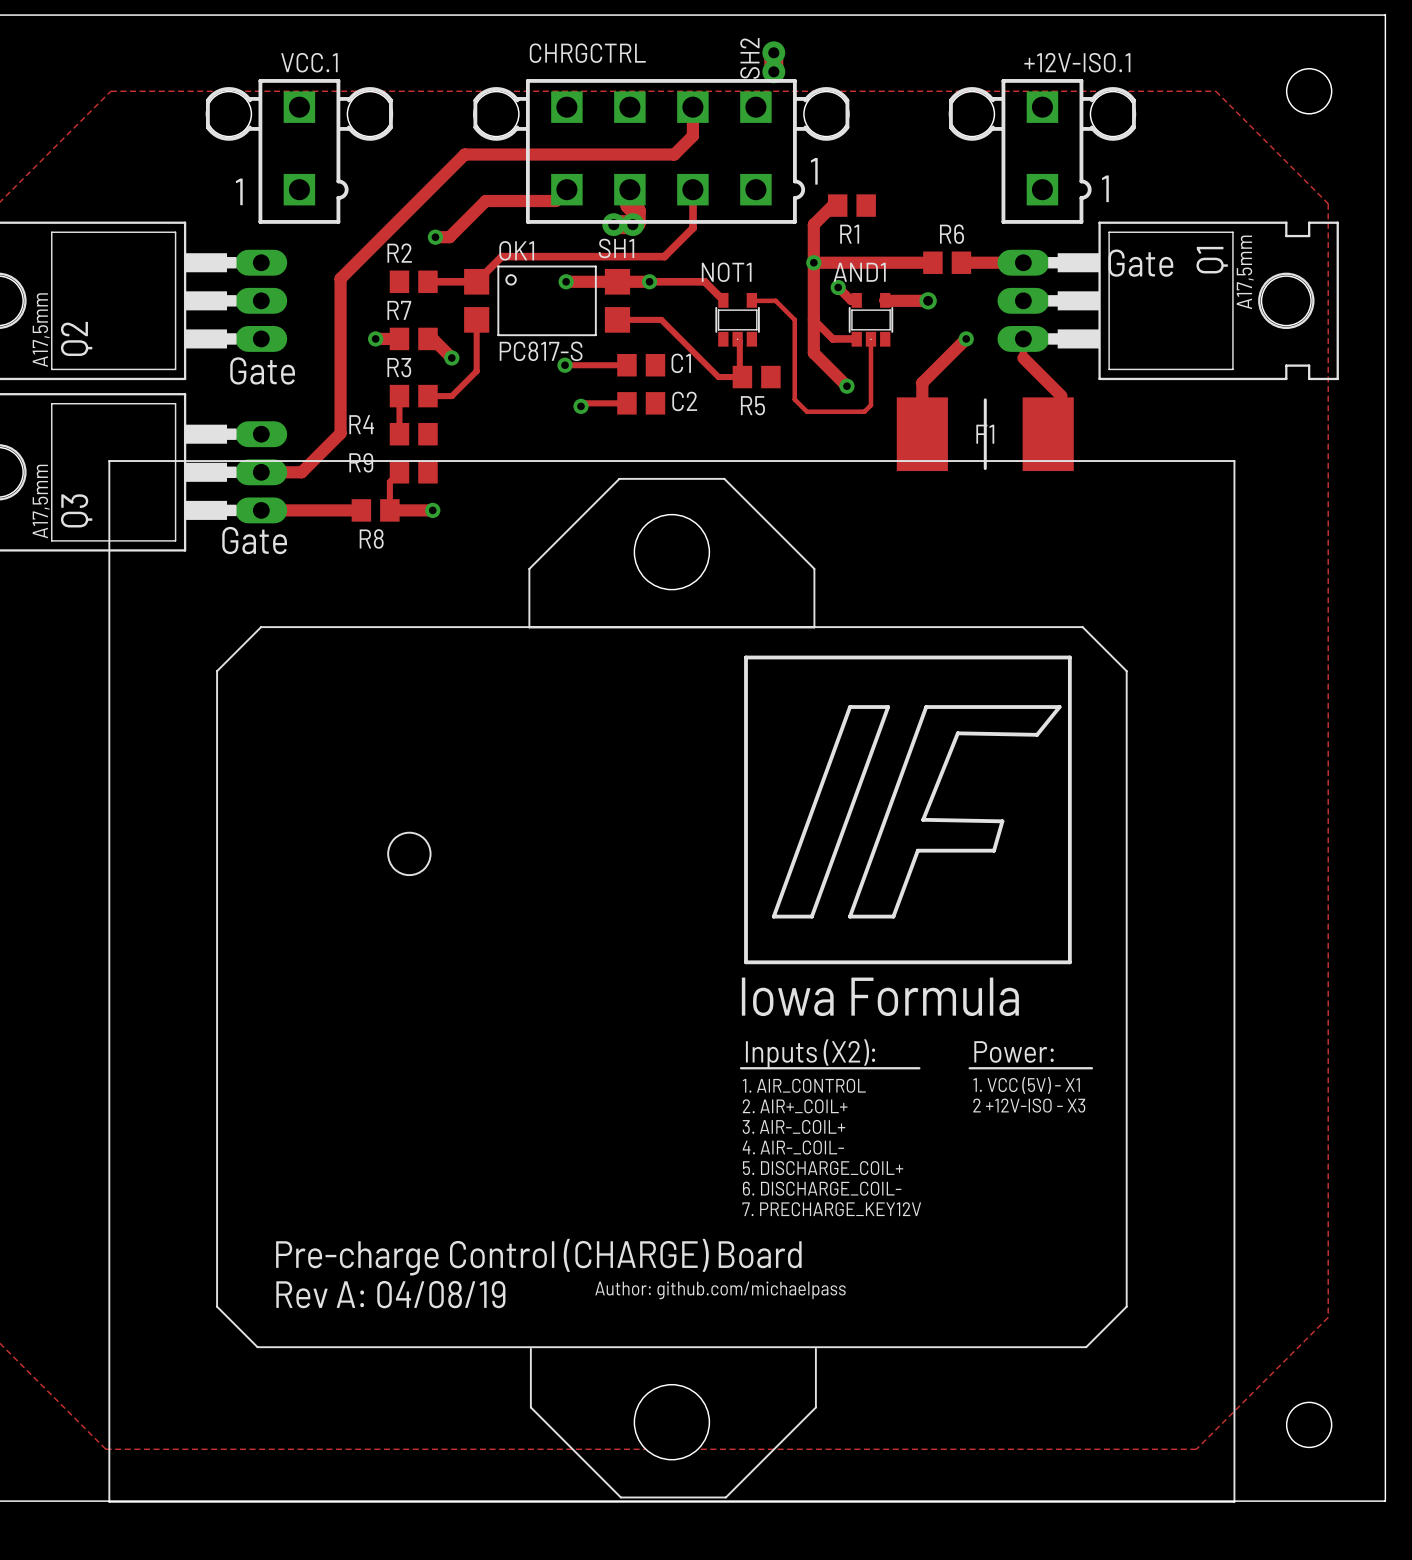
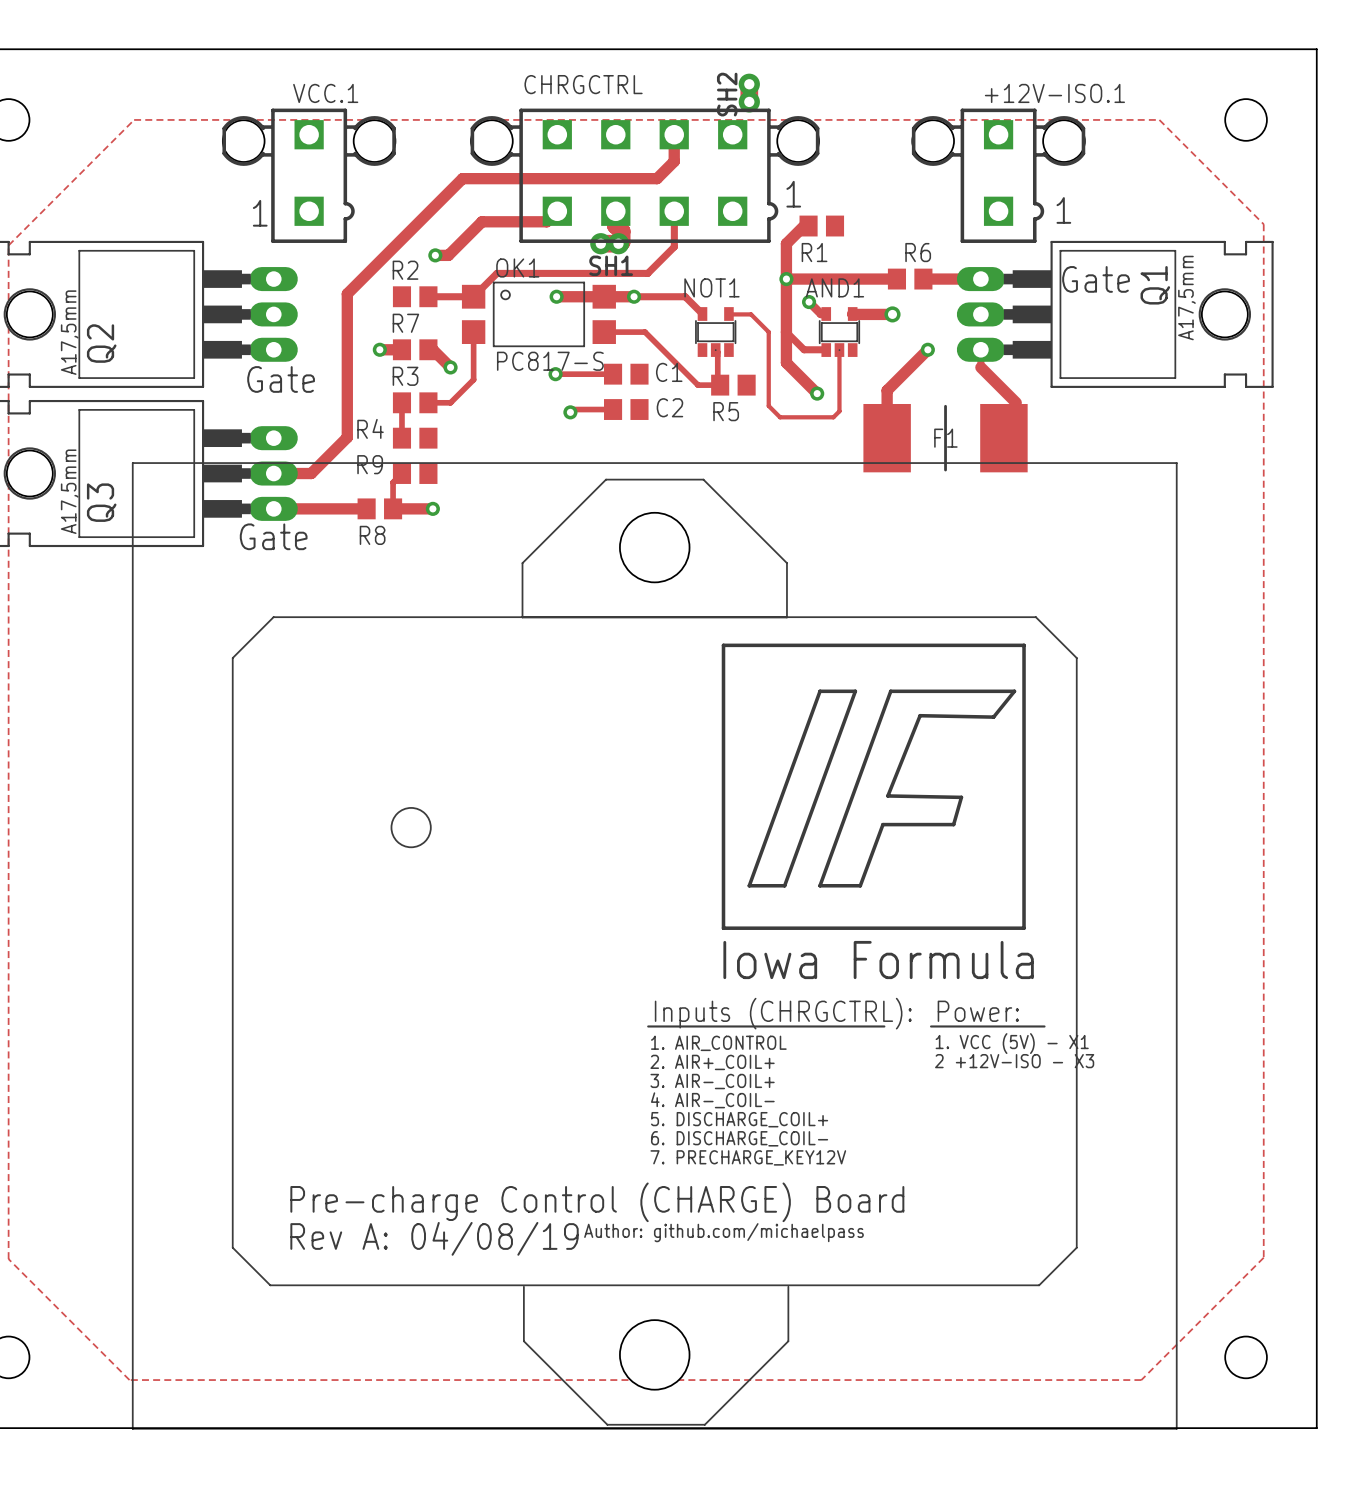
text: Inputs (X2): (810, 1053) -> Inputs (CHRGCTRL): (783, 1013)
line: none -> (648, 1026) (718, 1026)
text position: 1. AIR_CONTROL (804, 1085) -> 1. AIR_CONTROL (718, 1043)
text position: 2. AIR+_COIL+ (795, 1106) -> 2. AIR+_COIL+ (712, 1062)
text position: 3. AIR-_COIL+ (793, 1126) -> 3. AIR-_COIL+ (712, 1081)
text position: 4. AIR-_COIL- (793, 1147) -> 4. AIR-_COIL- (712, 1100)
text position: 5. DISCHARGE_COIL+ (823, 1168) -> 5. DISCHARGE_COIL+ (739, 1119)
text position: 6. DISCHARGE_COIL- (822, 1188) -> 6. DISCHARGE_COIL- (739, 1138)
text position: 7. PRECHARGE_KEY12V (831, 1209) -> 7. PRECHARGE_KEY12V (748, 1157)

